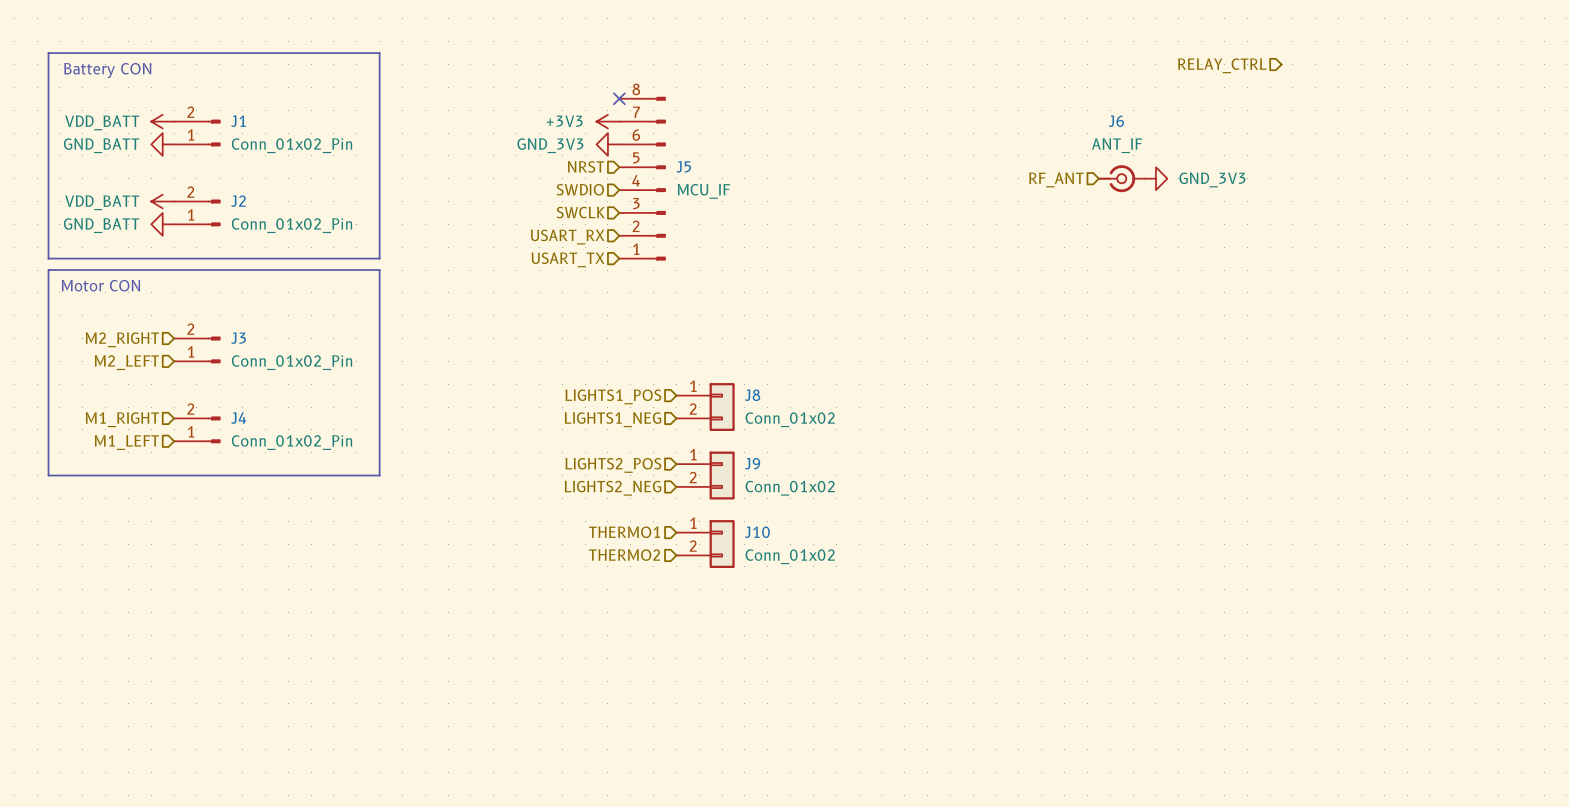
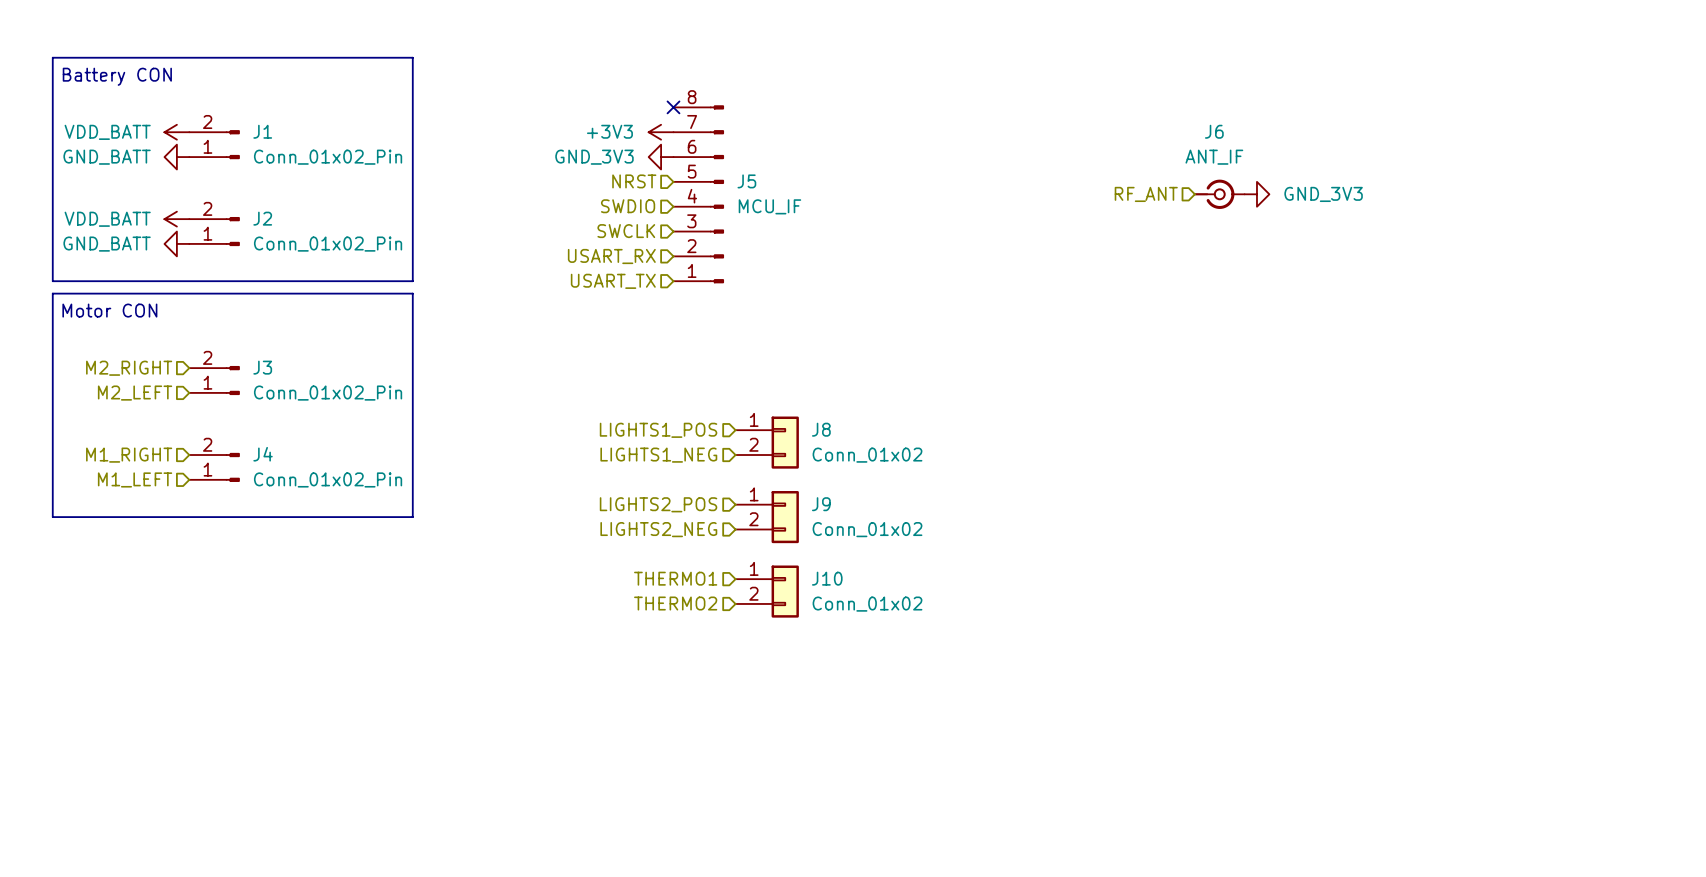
hierarchical label: RELAY_CTRL (1222, 65) -> none

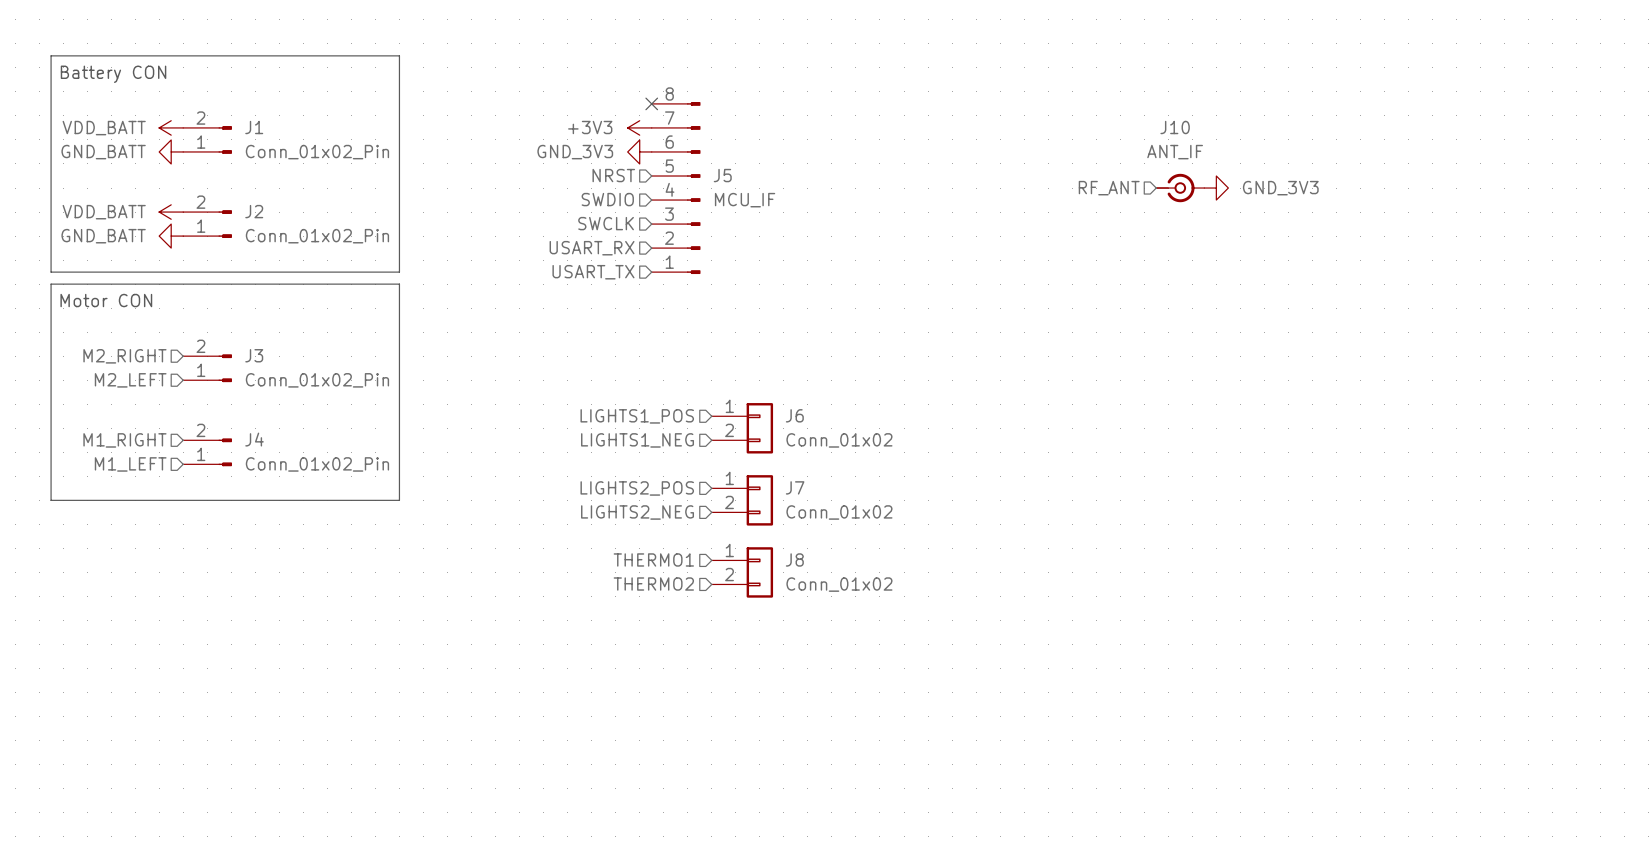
J6 name: J6 (1214, 131) -> J10 (1175, 127)
J8 name: J8 (821, 429) -> J6 (794, 415)
J9 name: J9 (821, 504) -> J7 (795, 487)
J10 name: J10 (827, 578) -> J8 (794, 559)

